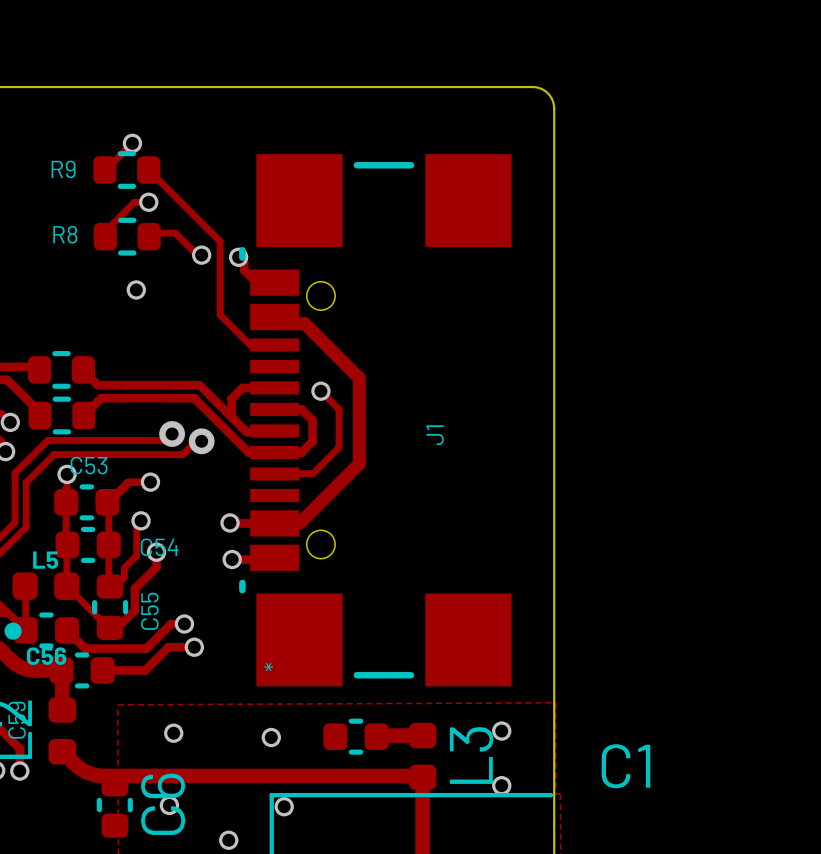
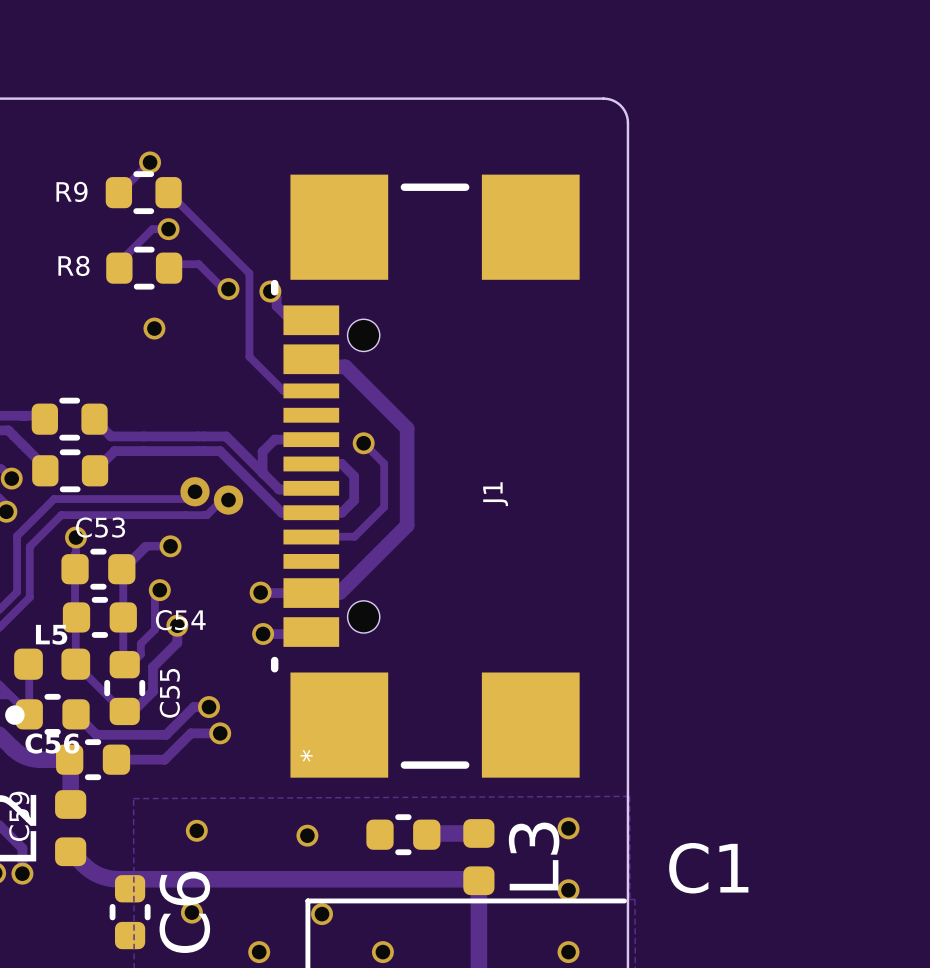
via: none -> (382, 952)
via: none -> (568, 952)

